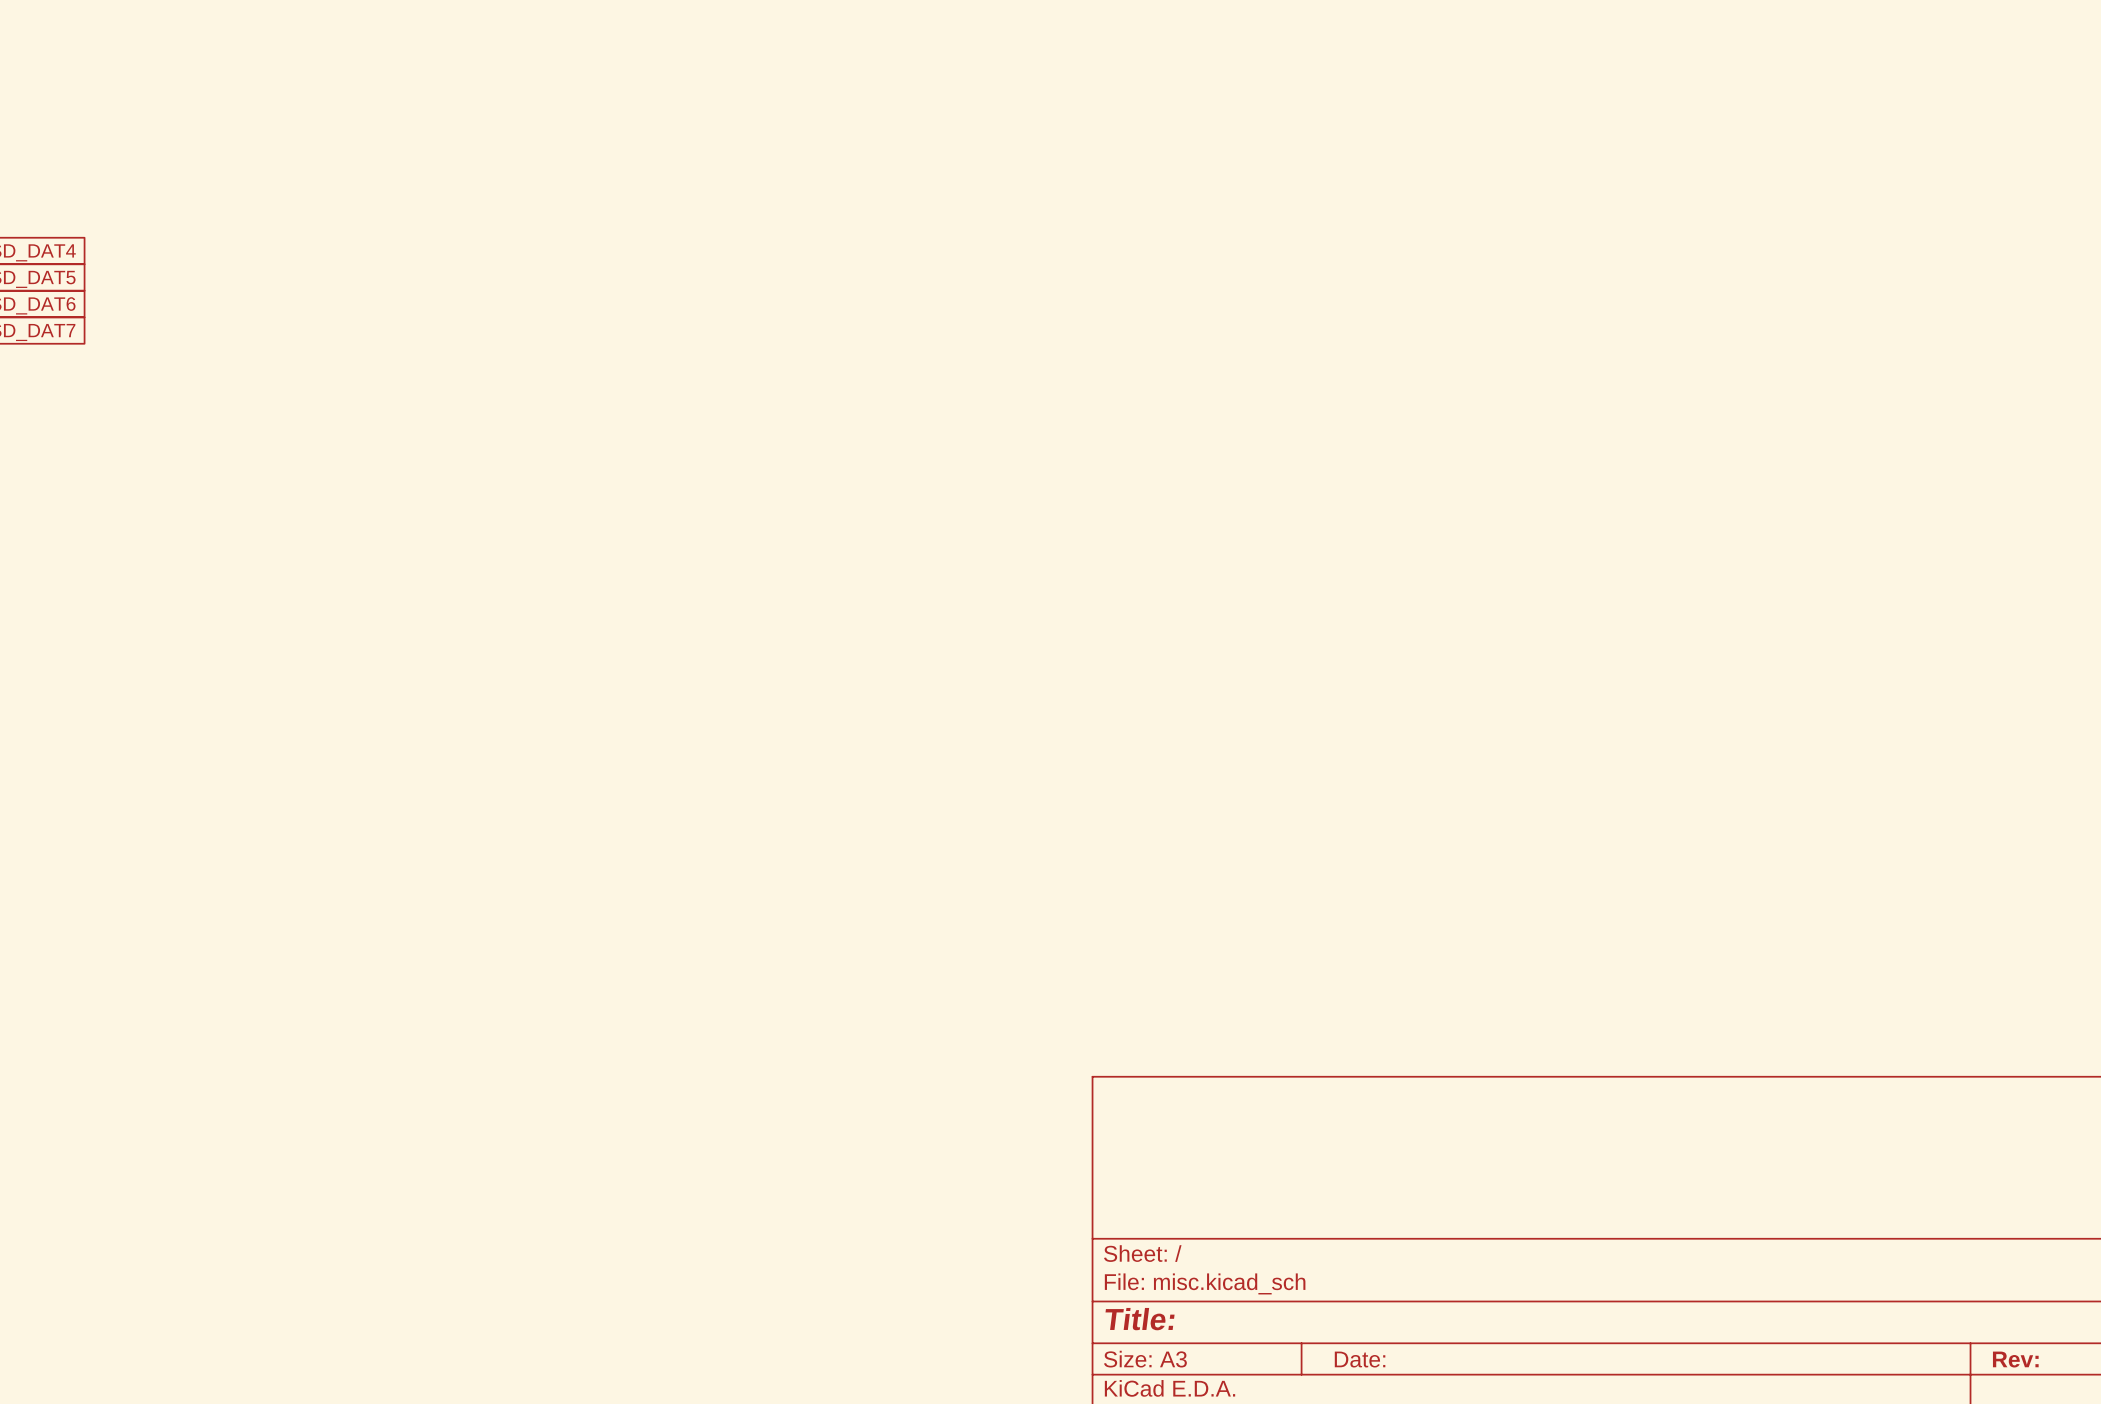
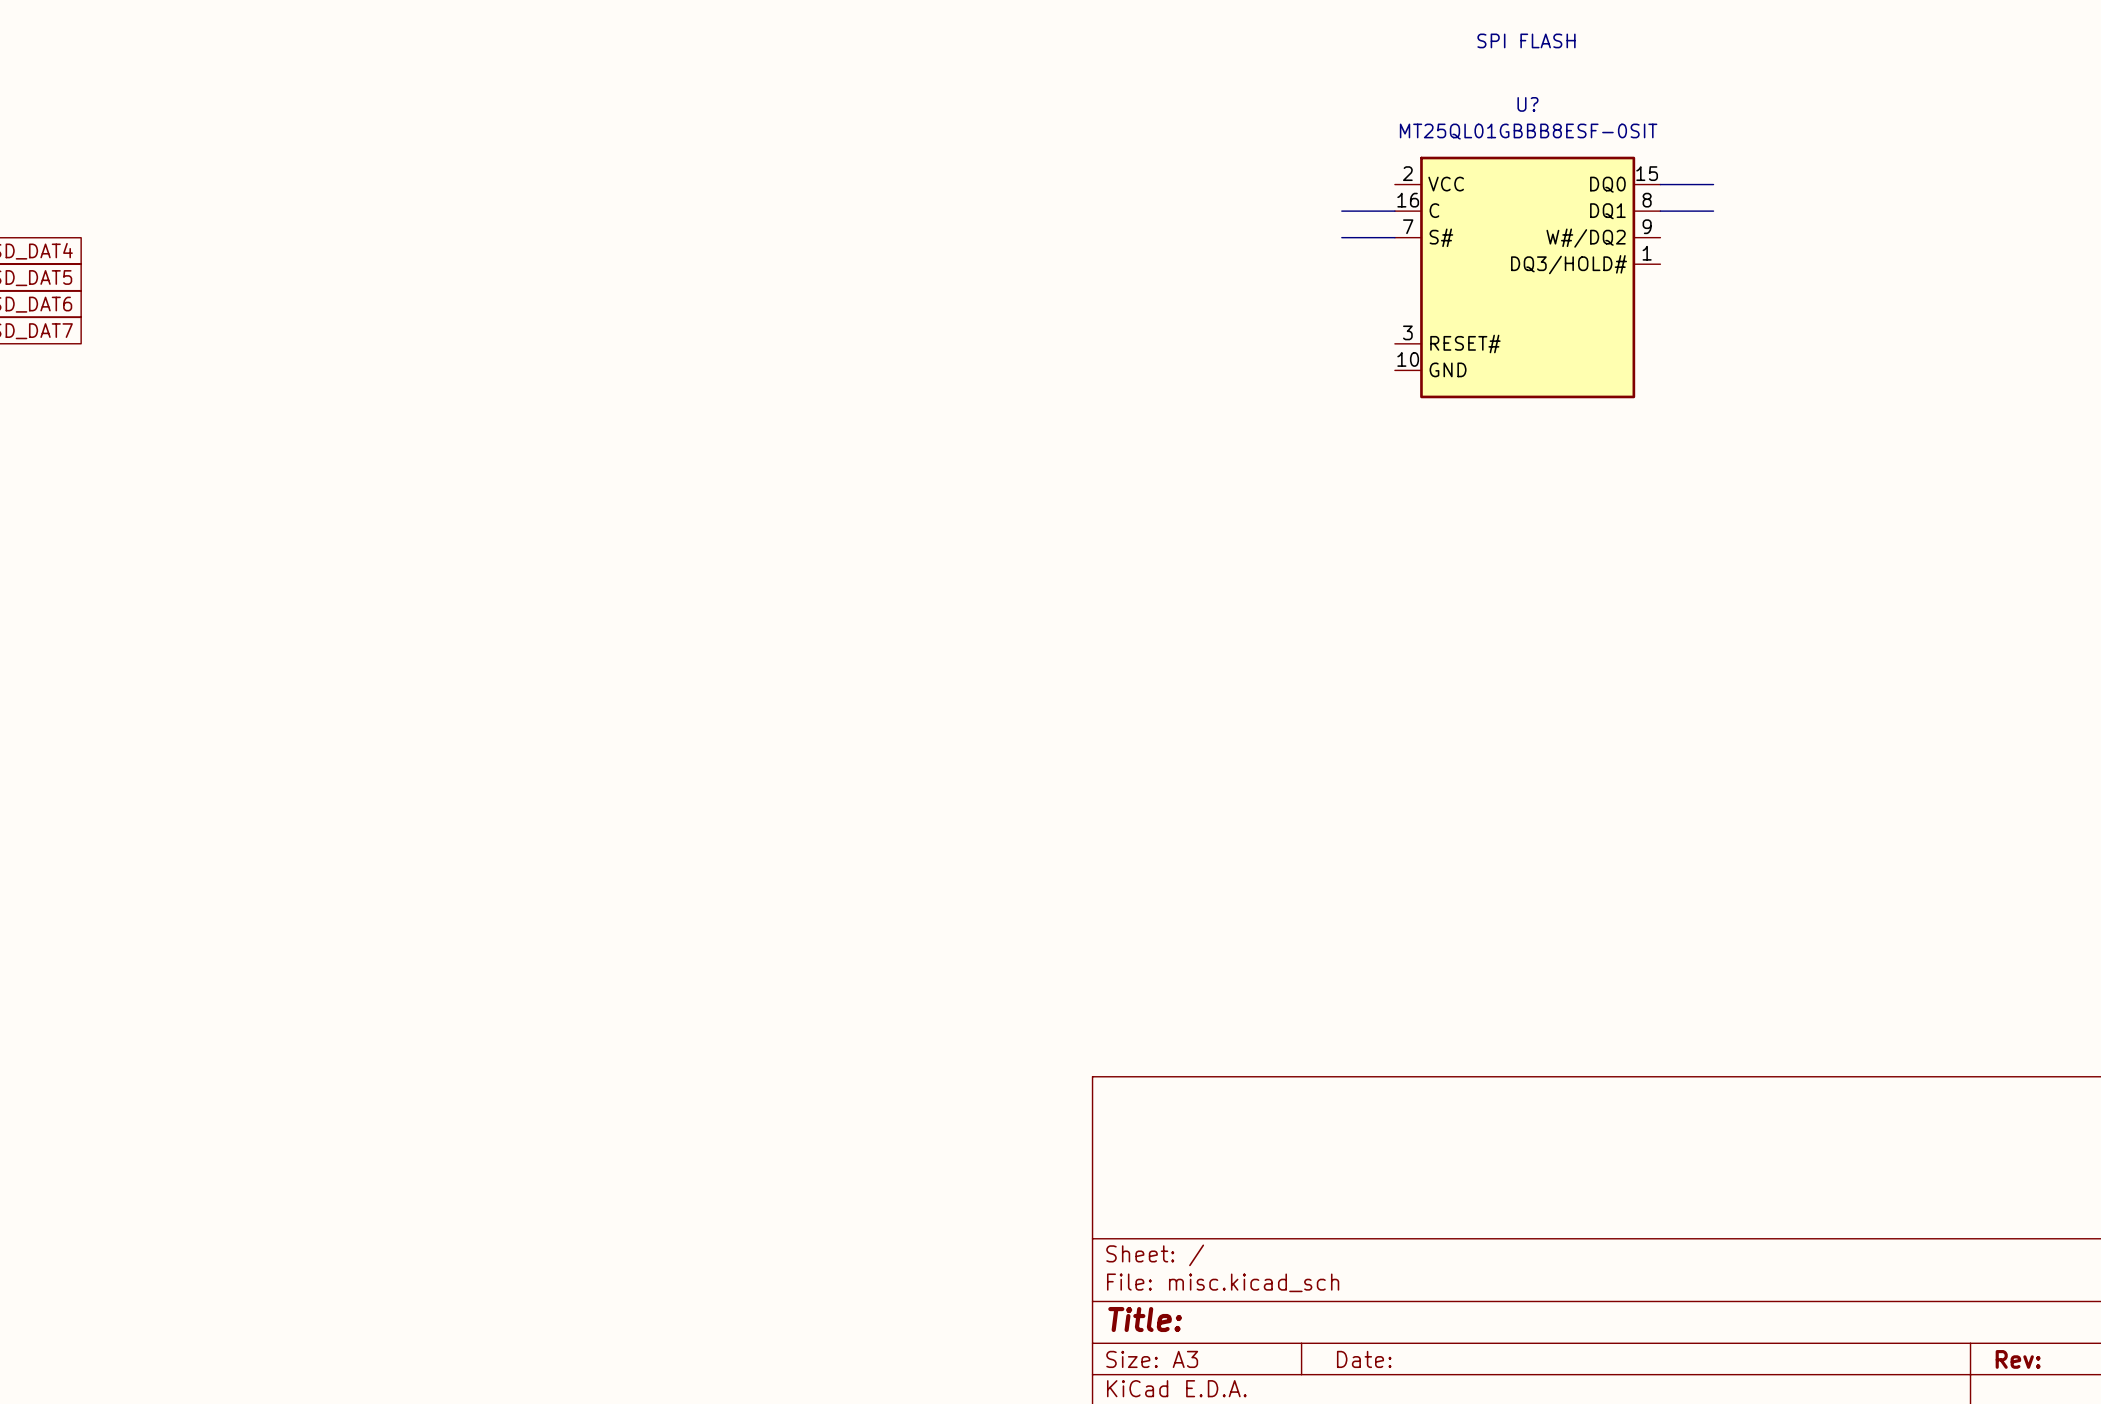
text: none -> SPI FLASH (1526, 40)
wire: none -> (1660, 184) (1713, 184)
wire: none -> (1341, 211) (1394, 211)
wire: none -> (1660, 211) (1713, 211)
wire: none -> (1341, 237) (1394, 237)
U?: none -> (1527, 277)

